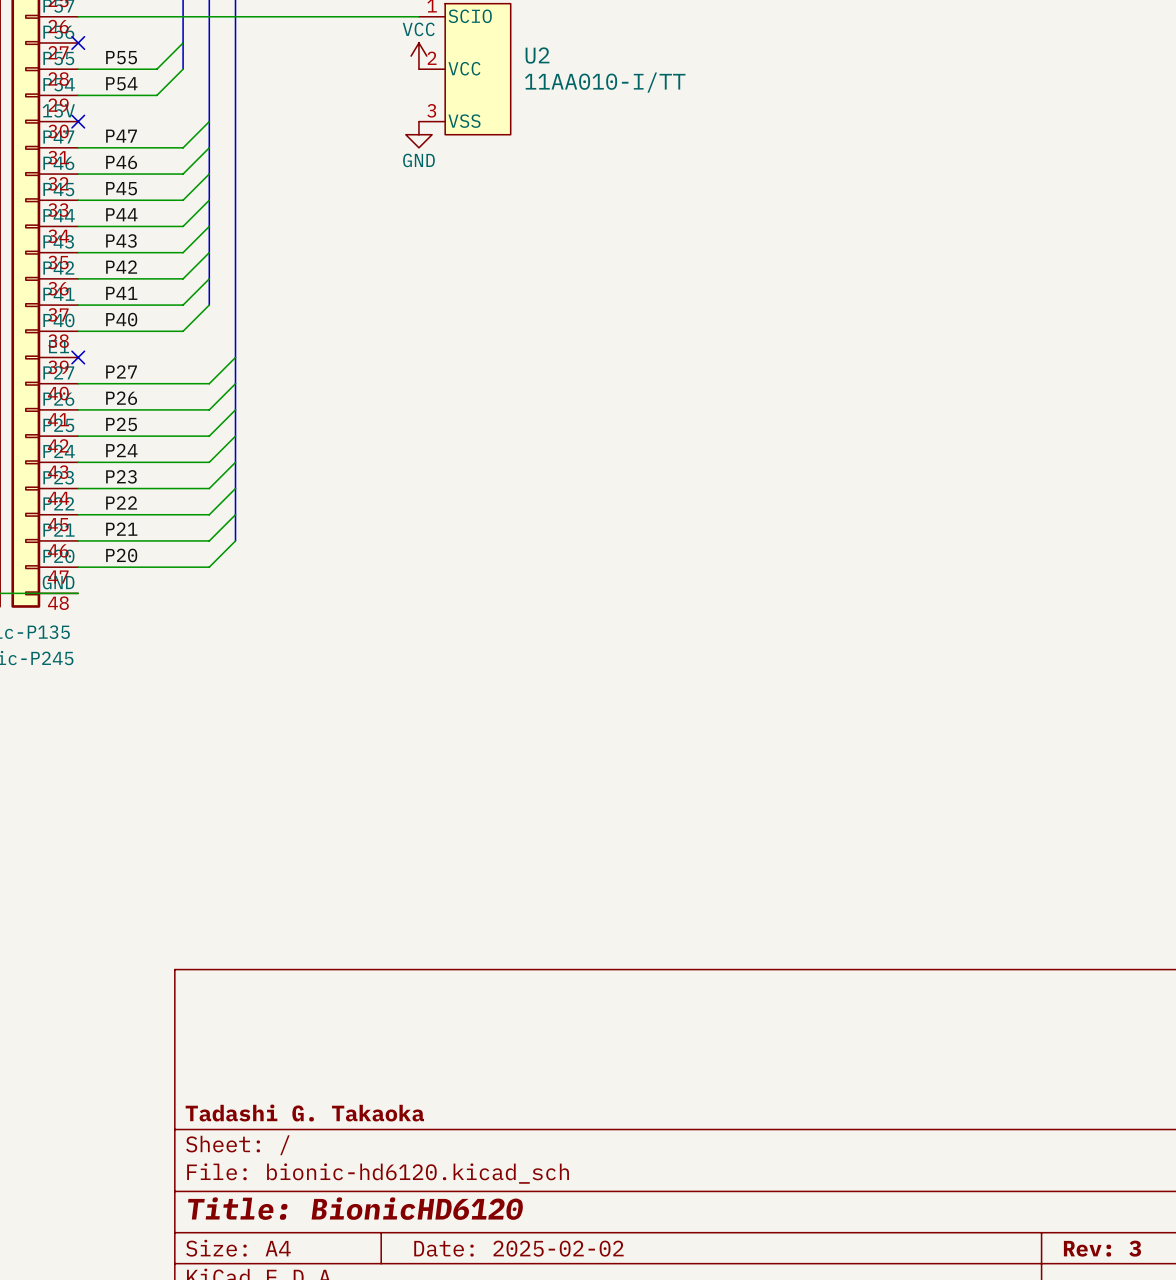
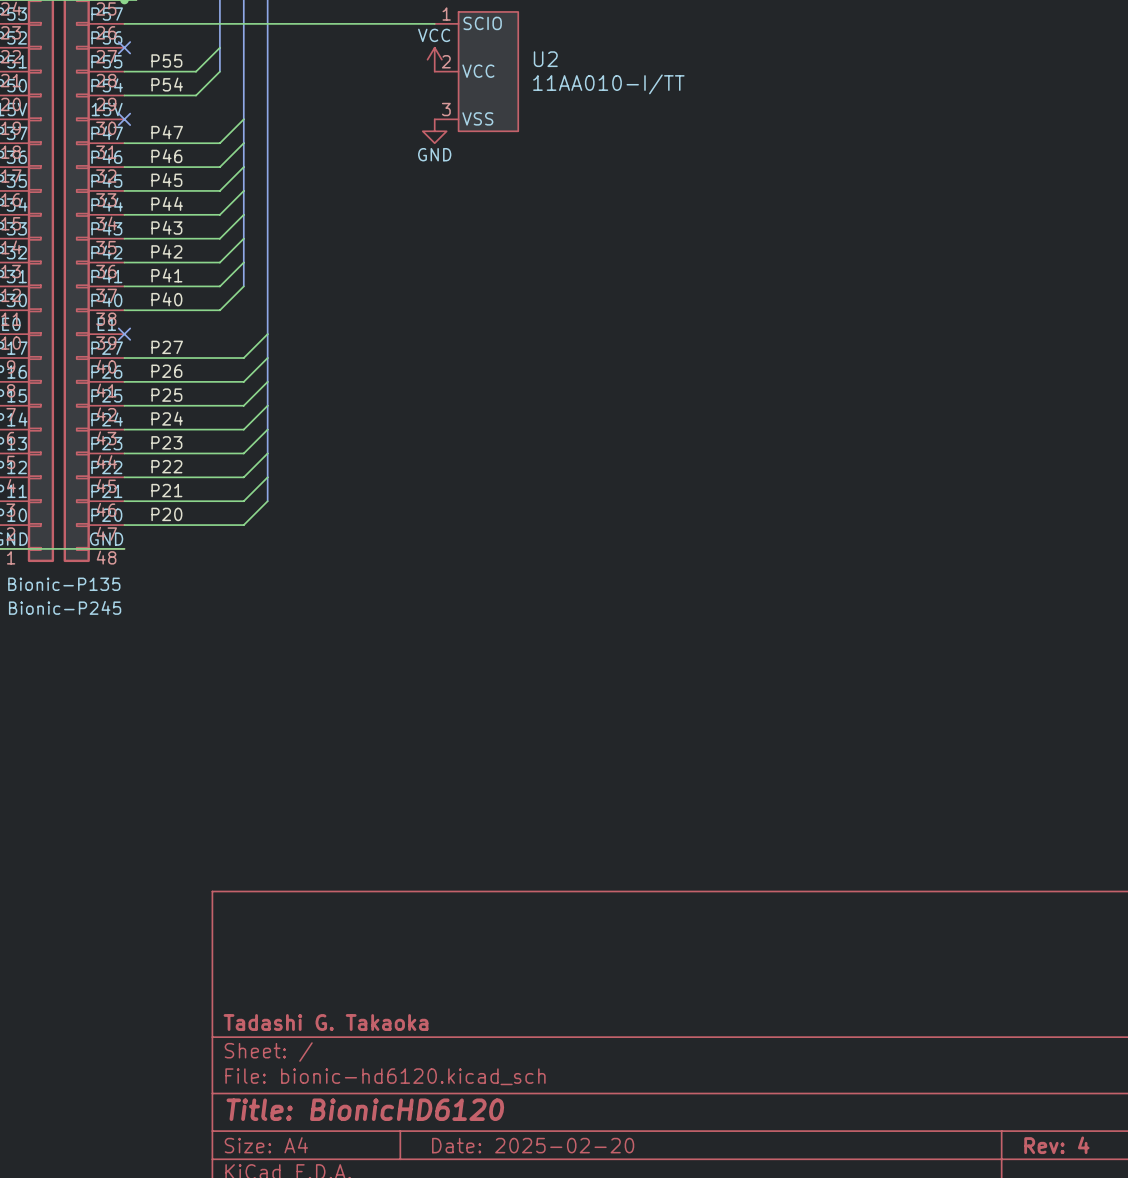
title block: Date: 2025-02-02 (518, 1248) -> Date: 2025-02-20 (533, 1145)
title block: Rev: 3 (1102, 1248) -> Rev: 4 (1056, 1145)

